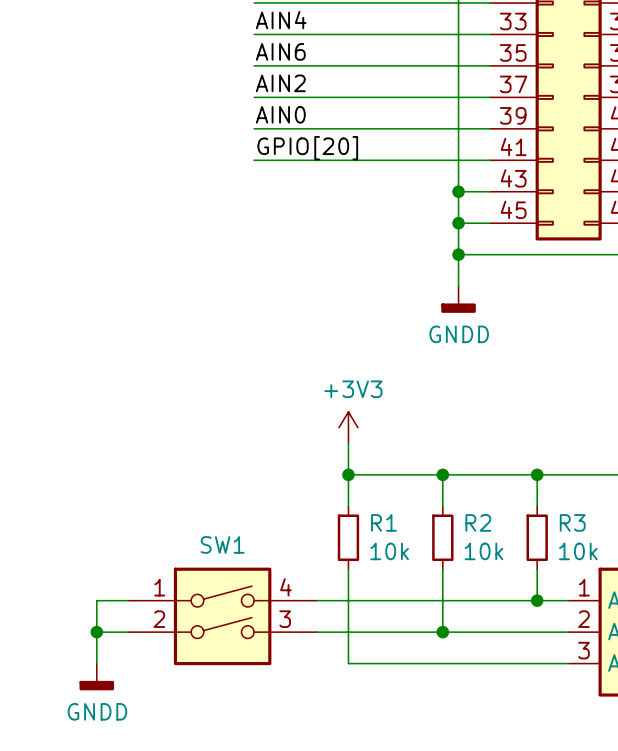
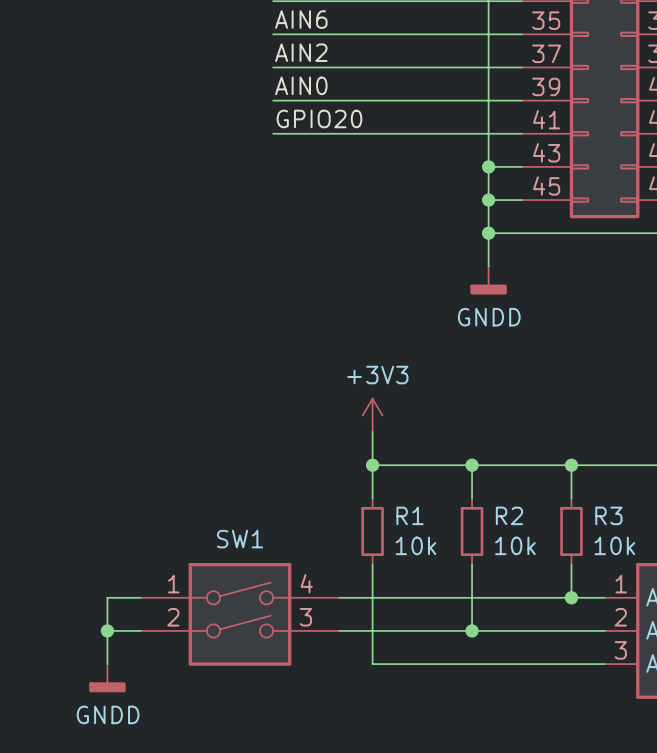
label: GPIO[20] (307, 148) -> GPIO20 (319, 118)

